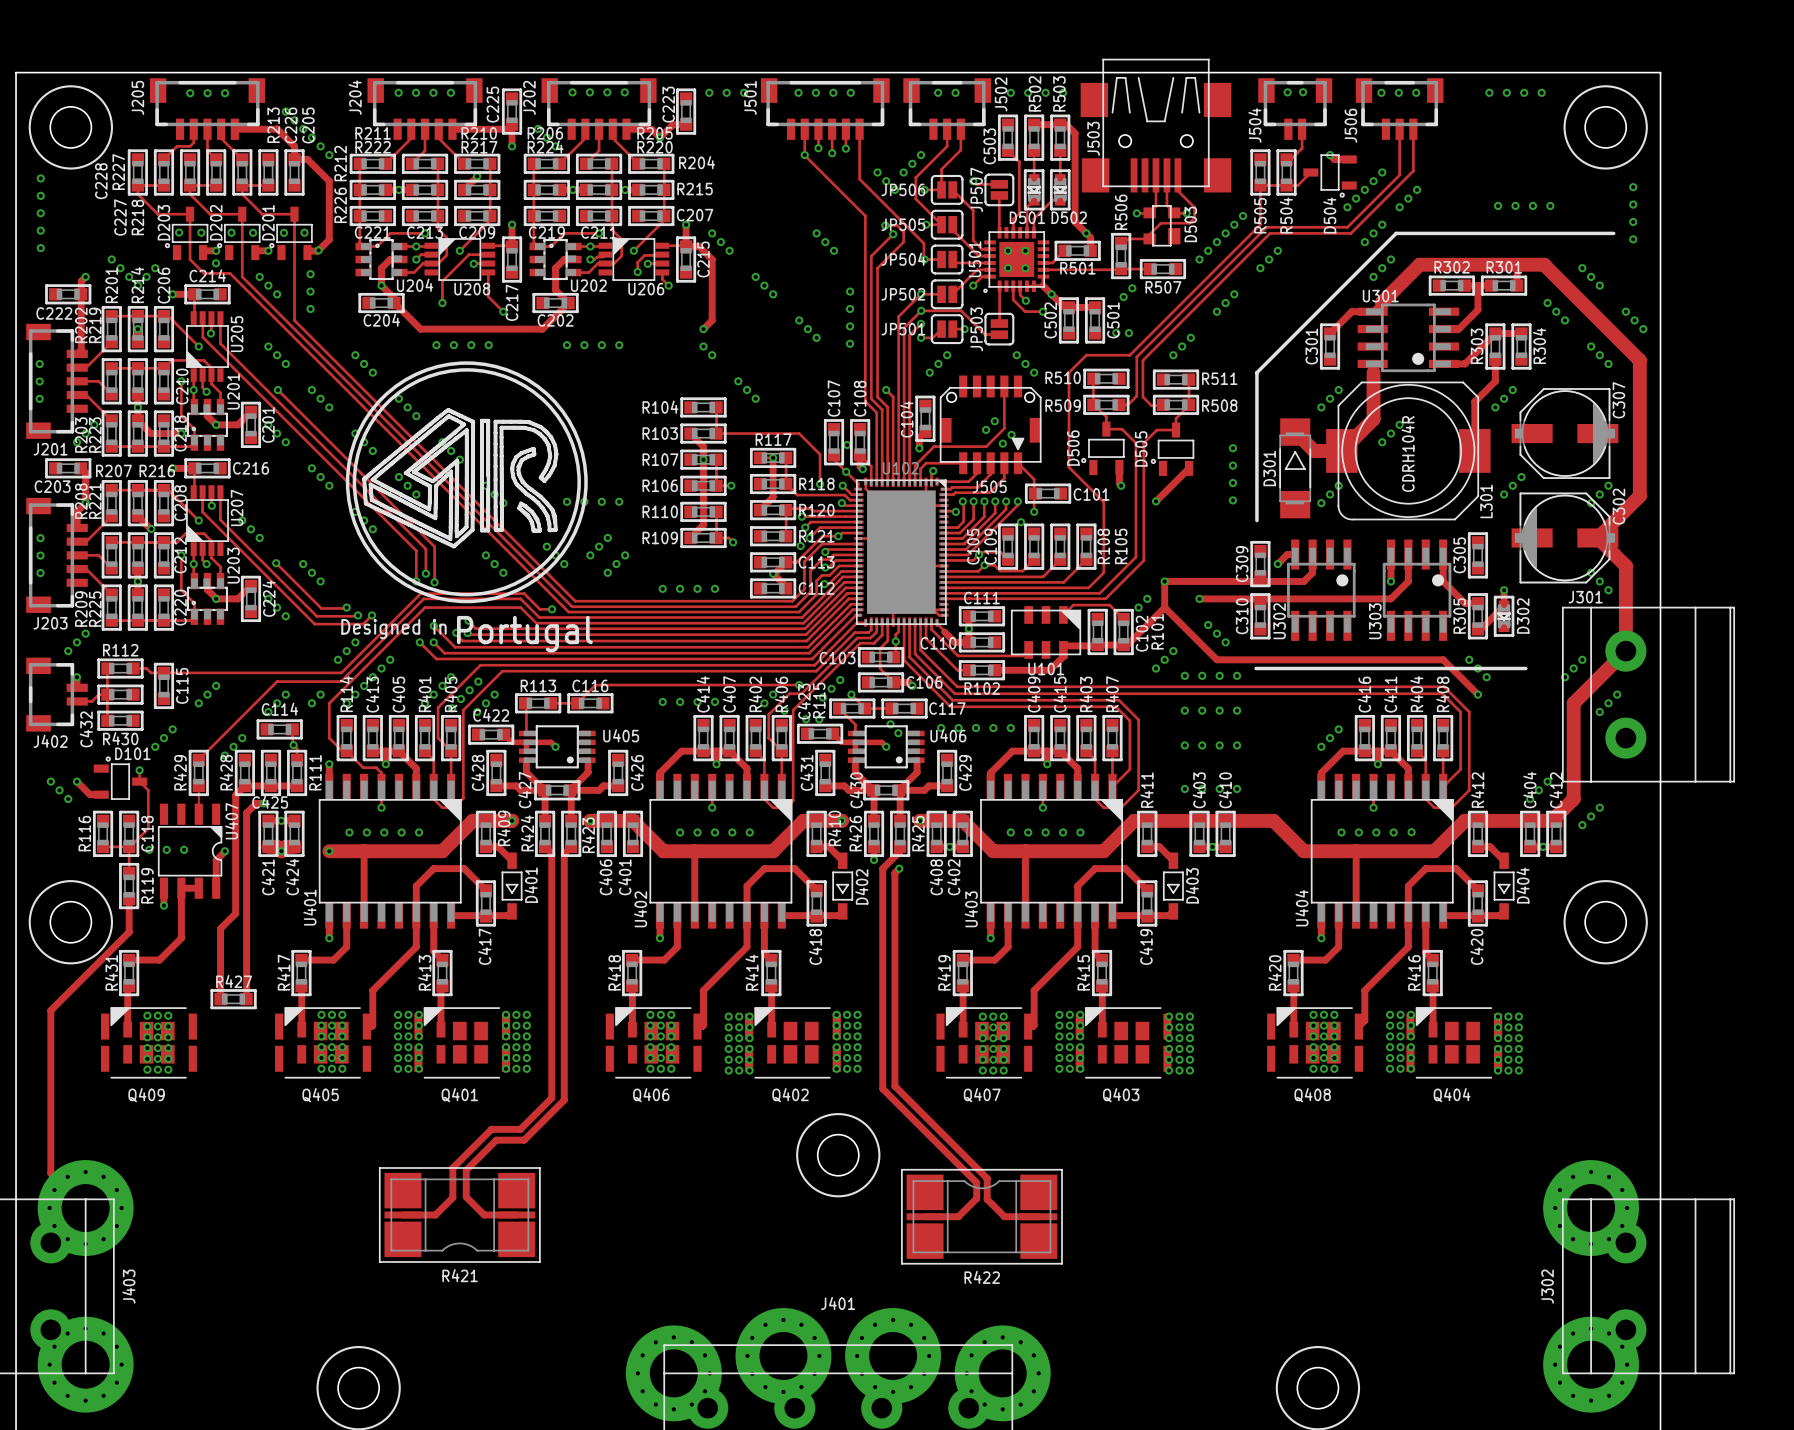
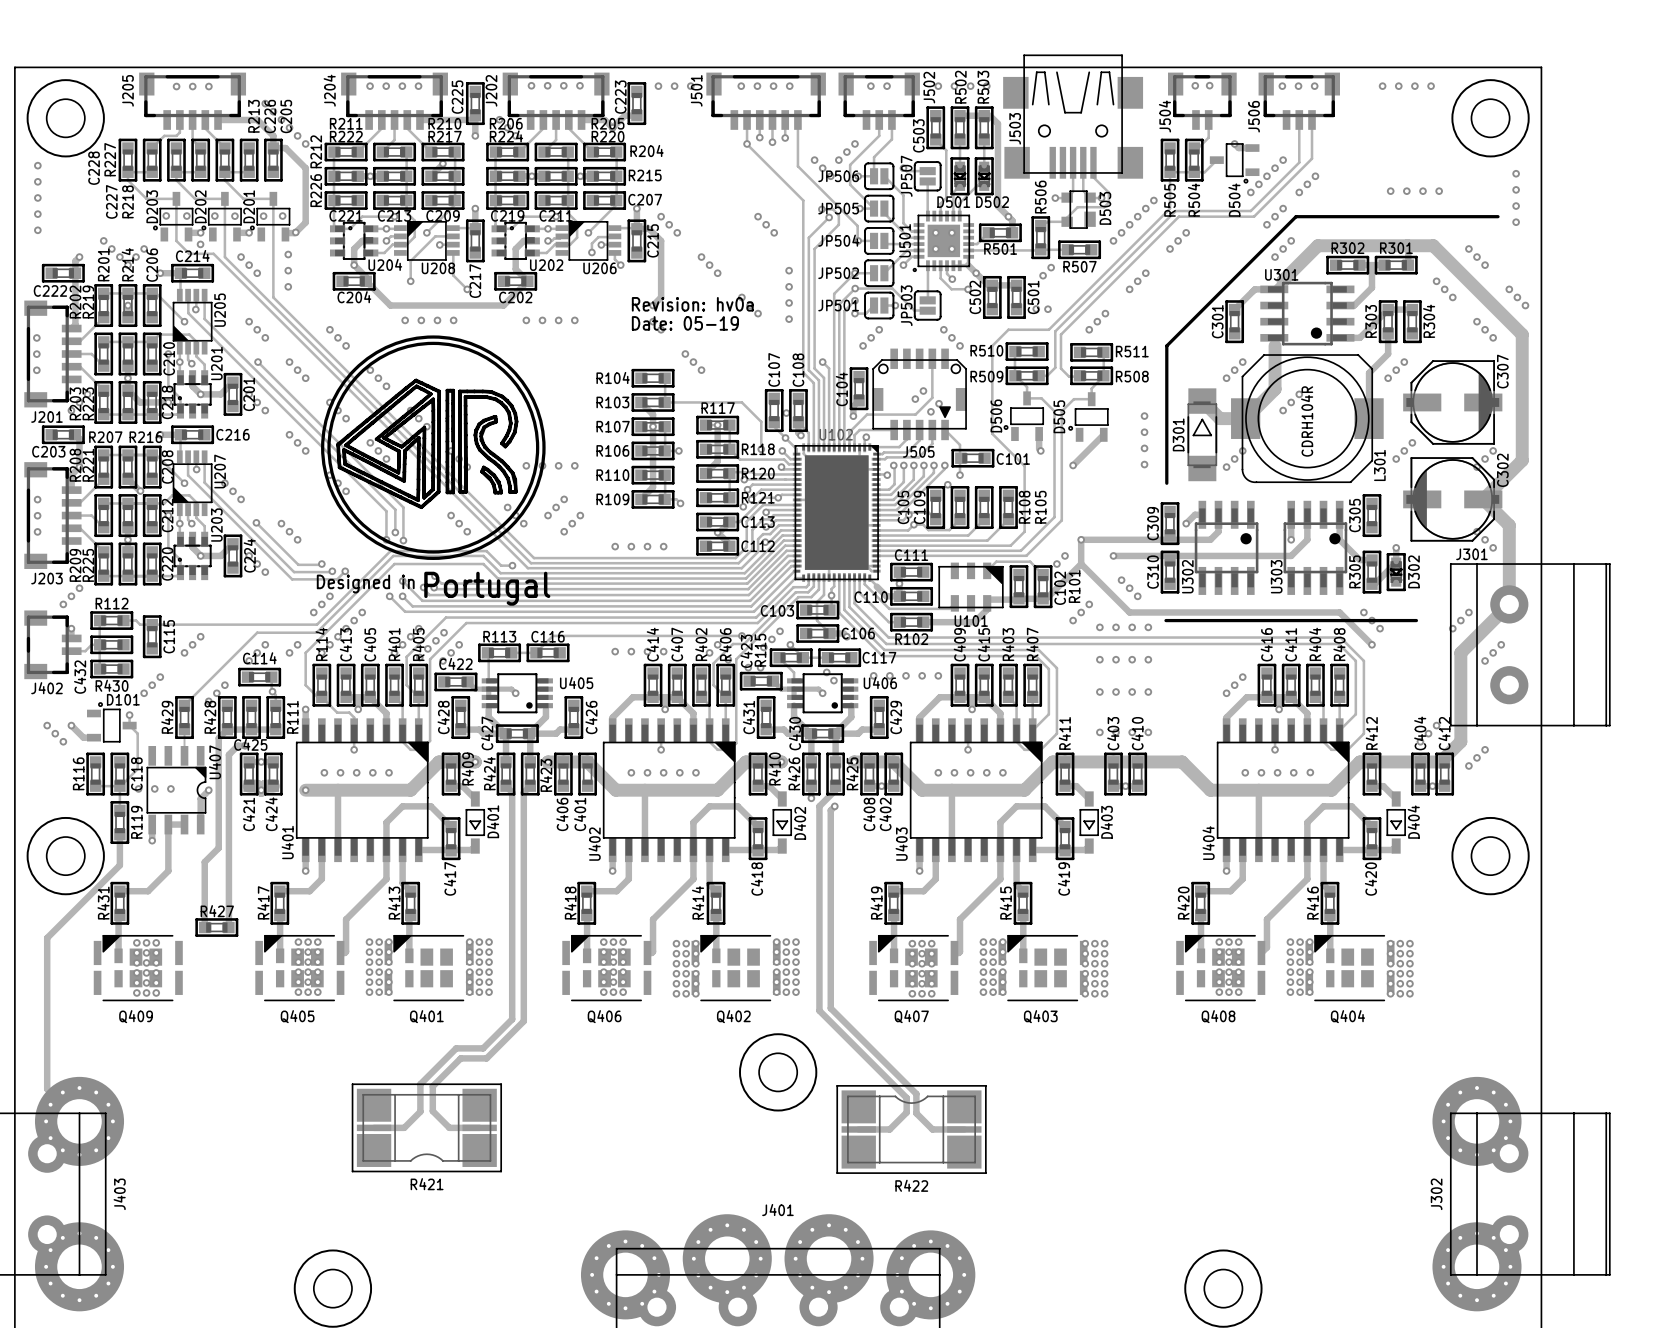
text: none -> Revision: hv0a (692, 304)
text: none -> Date: 05-19 (685, 323)

